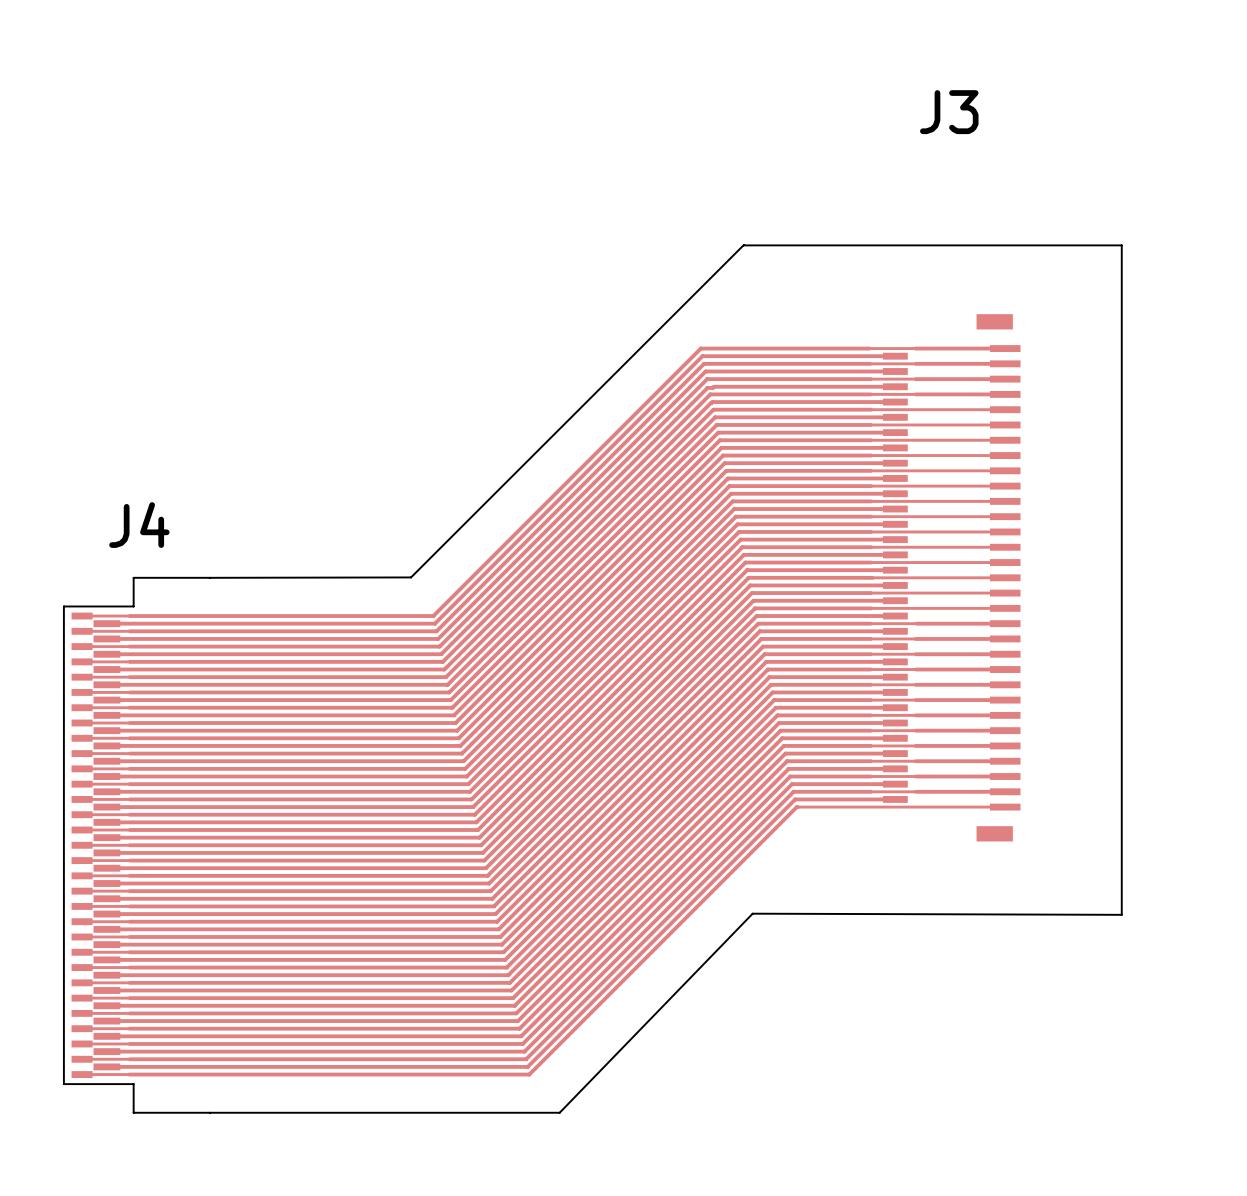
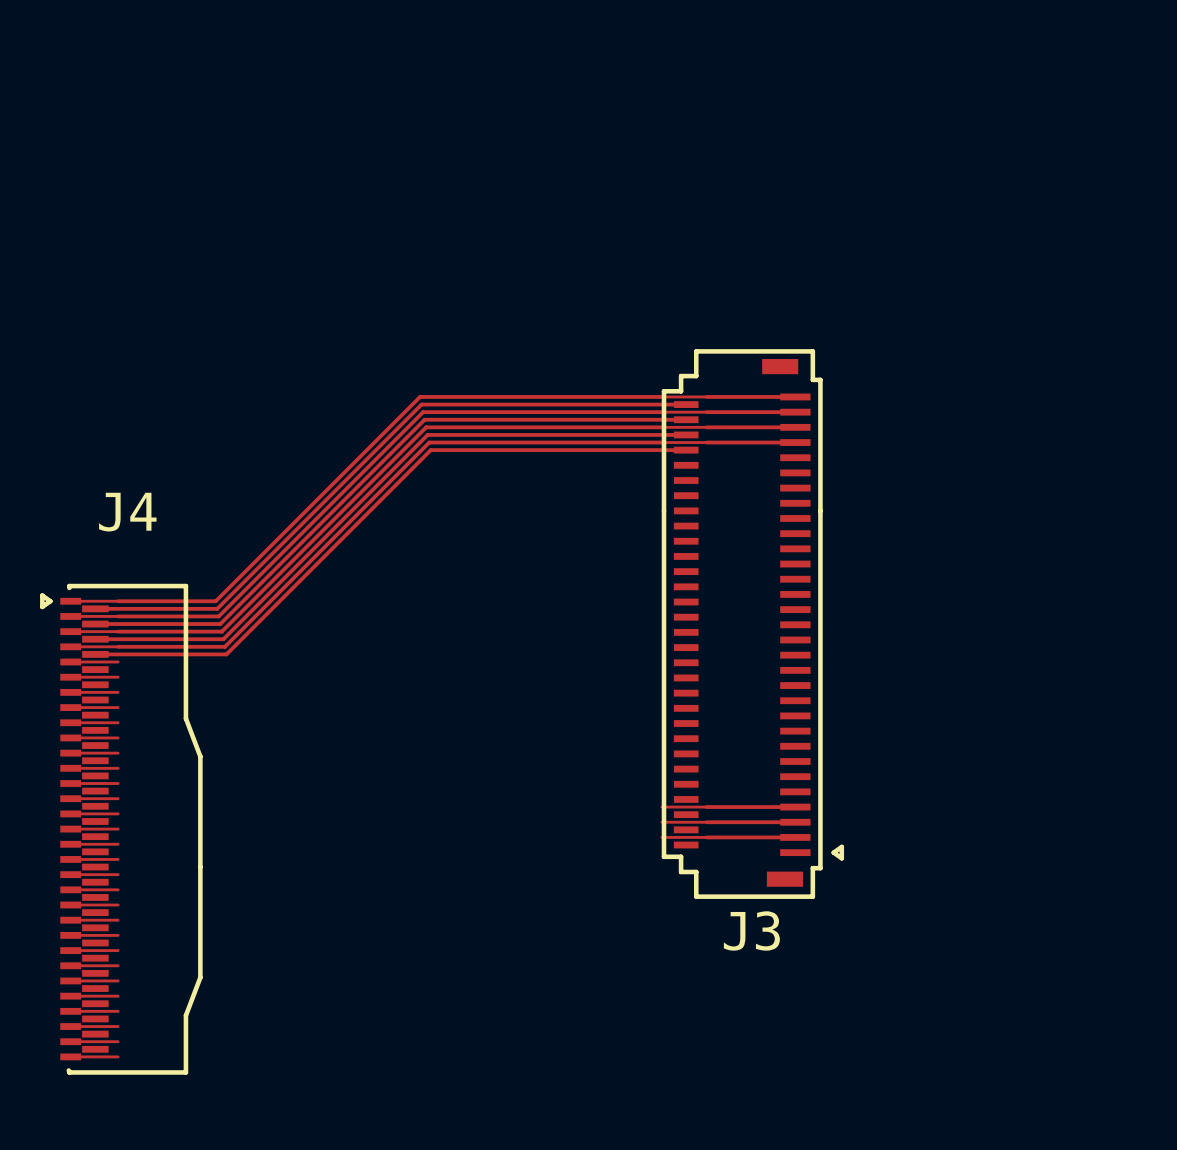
J3 name position: J3 (949, 112) -> J3 (751, 930)
board edge: (743, 245) (411, 577) (210, 577) -> none
board edge: (743, 245) (1121, 245) (1121, 914) (752, 913) (559, 1112) (210, 1112) -> none
J3 footprint: [882, 314, 1021, 842] -> [661, 349, 845, 899]
top track: (915, 348) (1005, 348) -> none
top track: (916, 348) (700, 348) (433, 616) (228, 616) -> (795, 396) (420, 396) (215, 601)
top track: (895, 356) (702, 356) (434, 623) (229, 623) -> (686, 404) (421, 404) (217, 608)
top track: (1005, 363) (704, 363) (436, 631) (231, 631) -> (795, 412) (423, 412) (218, 616)
top track: (895, 371) (705, 371) (438, 638) (232, 638) -> (686, 419) (424, 419) (220, 624)
top track: (1005, 379) (707, 379) (439, 646) (234, 646) -> (795, 427) (426, 427) (221, 631)
top track: (895, 386) (707, 387) (441, 654) (235, 654) -> (686, 434) (427, 434) (223, 639)
top track: (1005, 394) (710, 394) (442, 661) (237, 661) -> (795, 442) (429, 442) (224, 646)
top track: (895, 402) (711, 403) -> none
top track: (710, 403) (444, 669) (238, 669) -> (686, 450) (430, 450) (226, 654)
top track: (1005, 409) (713, 409) (446, 677) (129, 677) -> none
top track: (895, 417) (715, 417) (447, 684) (106, 684) -> none
top track: (1005, 424) (716, 424) (449, 692) (129, 692) -> none
top track: (895, 432) (718, 432) (450, 700) (106, 700) -> none
top track: (1005, 440) (719, 440) (452, 707) (129, 707) -> none
top track: (895, 447) (721, 447) (454, 715) (106, 715) -> none
top track: (1005, 455) (723, 455) (455, 723) (129, 723) -> none
top track: (895, 463) (724, 463) (457, 730) (106, 730) -> none
top track: (1005, 470) (726, 470) (458, 738) (129, 738) -> none
top track: (895, 478) (727, 478) (460, 745) (106, 745) -> none
top track: (1005, 486) (729, 486) (462, 753) (129, 753) -> none
top track: (895, 493) (731, 493) (463, 761) (106, 761) -> none
top track: (1005, 501) (732, 501) (465, 768) (129, 768) -> none
top track: (895, 509) (734, 509) (466, 776) (106, 776) -> none
top track: (1005, 516) (735, 516) (468, 784) (129, 784) -> none
top track: (895, 524) (737, 524) (470, 791) (106, 791) -> none
top track: (1005, 531) (739, 531) (471, 799) (129, 799) -> none
top track: (895, 539) (740, 539) (473, 807) (106, 807) -> none
top track: (1005, 547) (742, 547) (474, 814) (129, 814) -> none
top track: (895, 554) (743, 554) (476, 822) (106, 822) -> none
top track: (1005, 562) (745, 562) (478, 830) (129, 830) -> none
top track: (895, 570) (747, 570) (479, 837) (106, 837) -> none
J4 footprint: [62, 576, 212, 1114] -> [40, 583, 203, 1075]
top track: (871, 577) (1005, 577) -> none
top track: (872, 577) (748, 577) (481, 845) (129, 845) -> none
top track: (895, 585) (750, 585) (482, 852) (106, 852) -> none
top track: (1005, 593) (751, 593) (484, 860) (129, 860) -> none
top track: (895, 600) (753, 600) (486, 868) (106, 868) -> none
top track: (1005, 608) (755, 608) (487, 875) (129, 875) -> none
top track: (895, 616) (756, 616) (489, 883) (106, 883) -> none
top track: (1005, 623) (758, 623) (490, 891) (129, 891) -> none
top track: (895, 631) (759, 631) (492, 898) (106, 898) -> none
top track: (1005, 638) (761, 638) (494, 906) (129, 906) -> none
top track: (895, 646) (763, 646) (495, 914) (106, 914) -> none
top track: (1005, 654) (764, 654) (497, 921) (129, 921) -> none
top track: (895, 661) (766, 661) (498, 929) (106, 929) -> none
top track: (1005, 669) (767, 669) (500, 936) (129, 936) -> none
top track: (895, 677) (769, 677) (501, 944) (106, 944) -> none
top track: (1005, 684) (771, 684) (503, 952) (129, 952) -> none
top track: (895, 692) (772, 692) (505, 959) (106, 959) -> none
top track: (1005, 700) (774, 700) (506, 967) (129, 967) -> none
top track: (895, 707) (775, 707) (508, 975) (106, 975) -> none
top track: (1005, 715) (777, 715) (509, 982) (129, 982) -> none
top track: (895, 723) (779, 723) (511, 990) (106, 990) -> none
top track: (1005, 730) (780, 730) (513, 998) (129, 998) -> none
top track: (895, 738) (782, 738) (514, 1005) (106, 1005) -> none
top track: (1005, 745) (783, 745) (516, 1013) (129, 1013) -> none
top track: (895, 753) (785, 753) (517, 1021) (106, 1021) -> none
top track: (1005, 761) (787, 761) (519, 1028) (129, 1028) -> none
top track: (895, 768) (788, 768) (521, 1036) (106, 1036) -> none
top track: (1005, 776) (790, 776) (522, 1043) (129, 1043) -> none
top track: (895, 784) (792, 784) (524, 1051) (106, 1051) -> none
top track: (1005, 791) (793, 791) (526, 1059) (129, 1059) -> none
top track: (895, 799) (795, 799) (527, 1066) (106, 1066) -> none
top track: (1005, 807) (796, 807) (529, 1074) (129, 1074) -> none
top track: none -> (661, 807) (795, 807)
top track: none -> (661, 822) (795, 822)
top track: none -> (661, 837) (795, 837)

